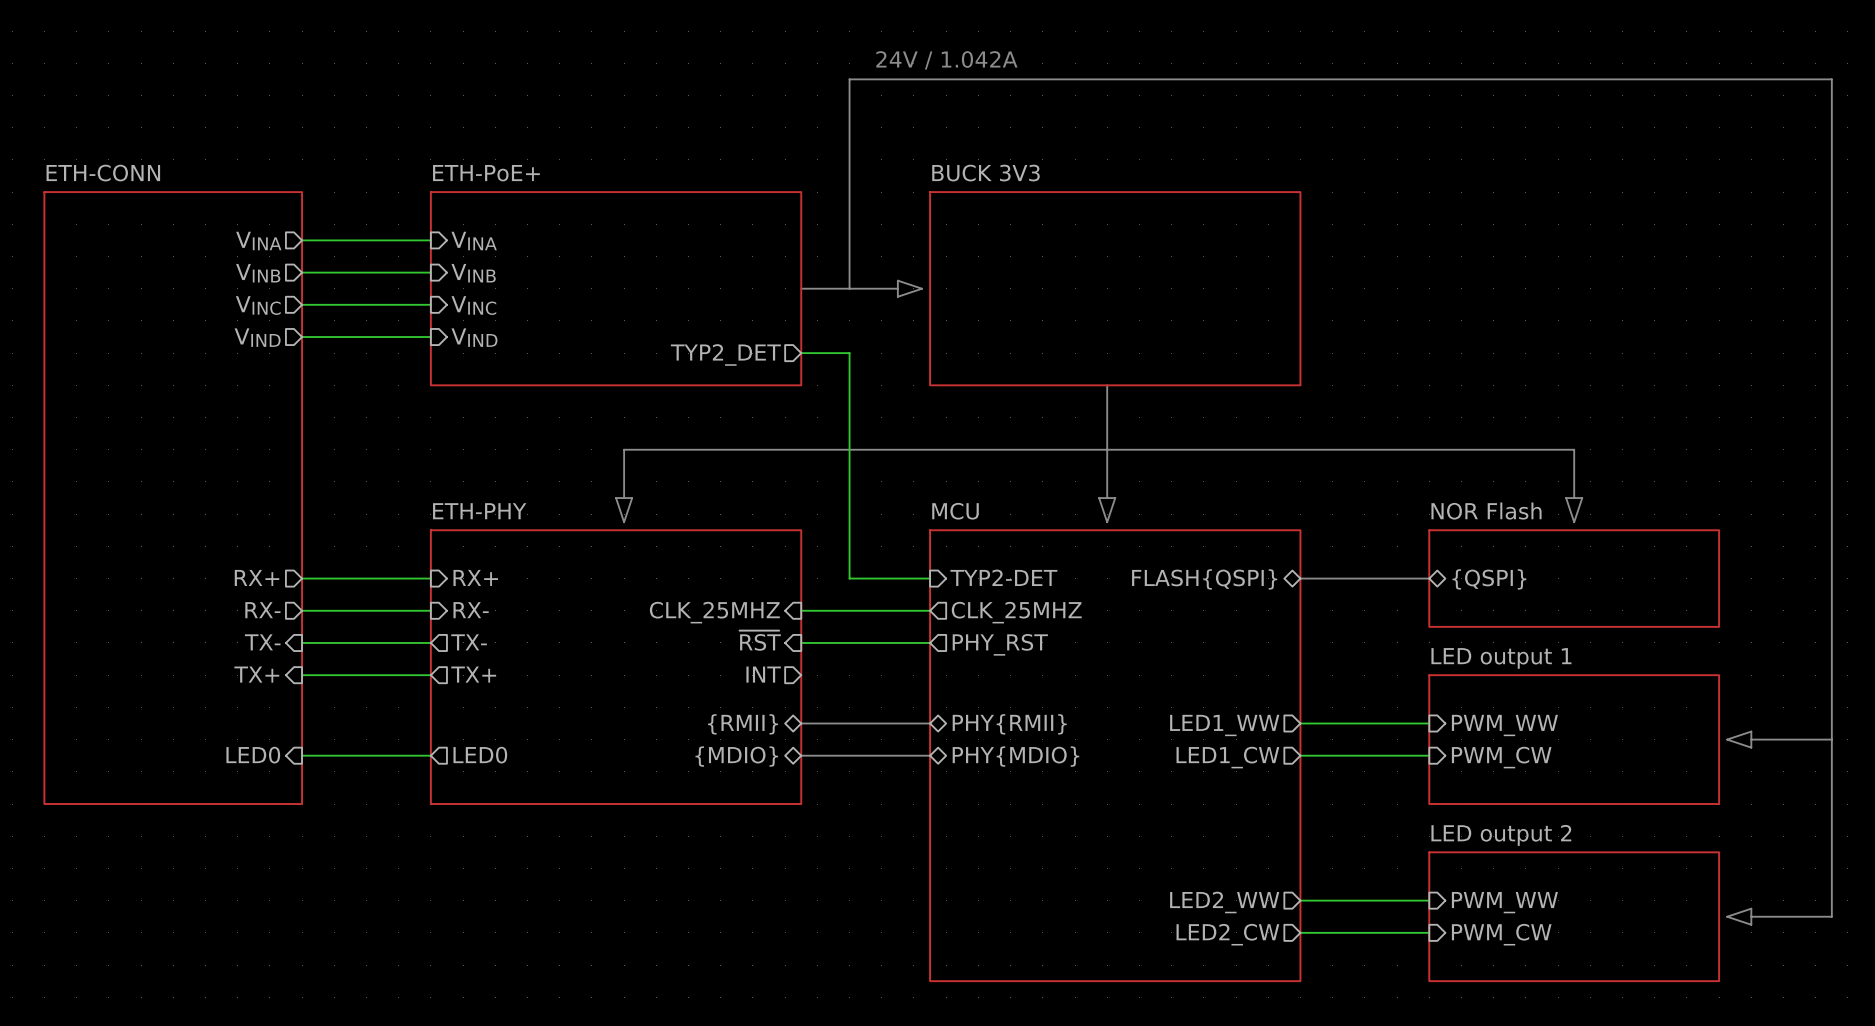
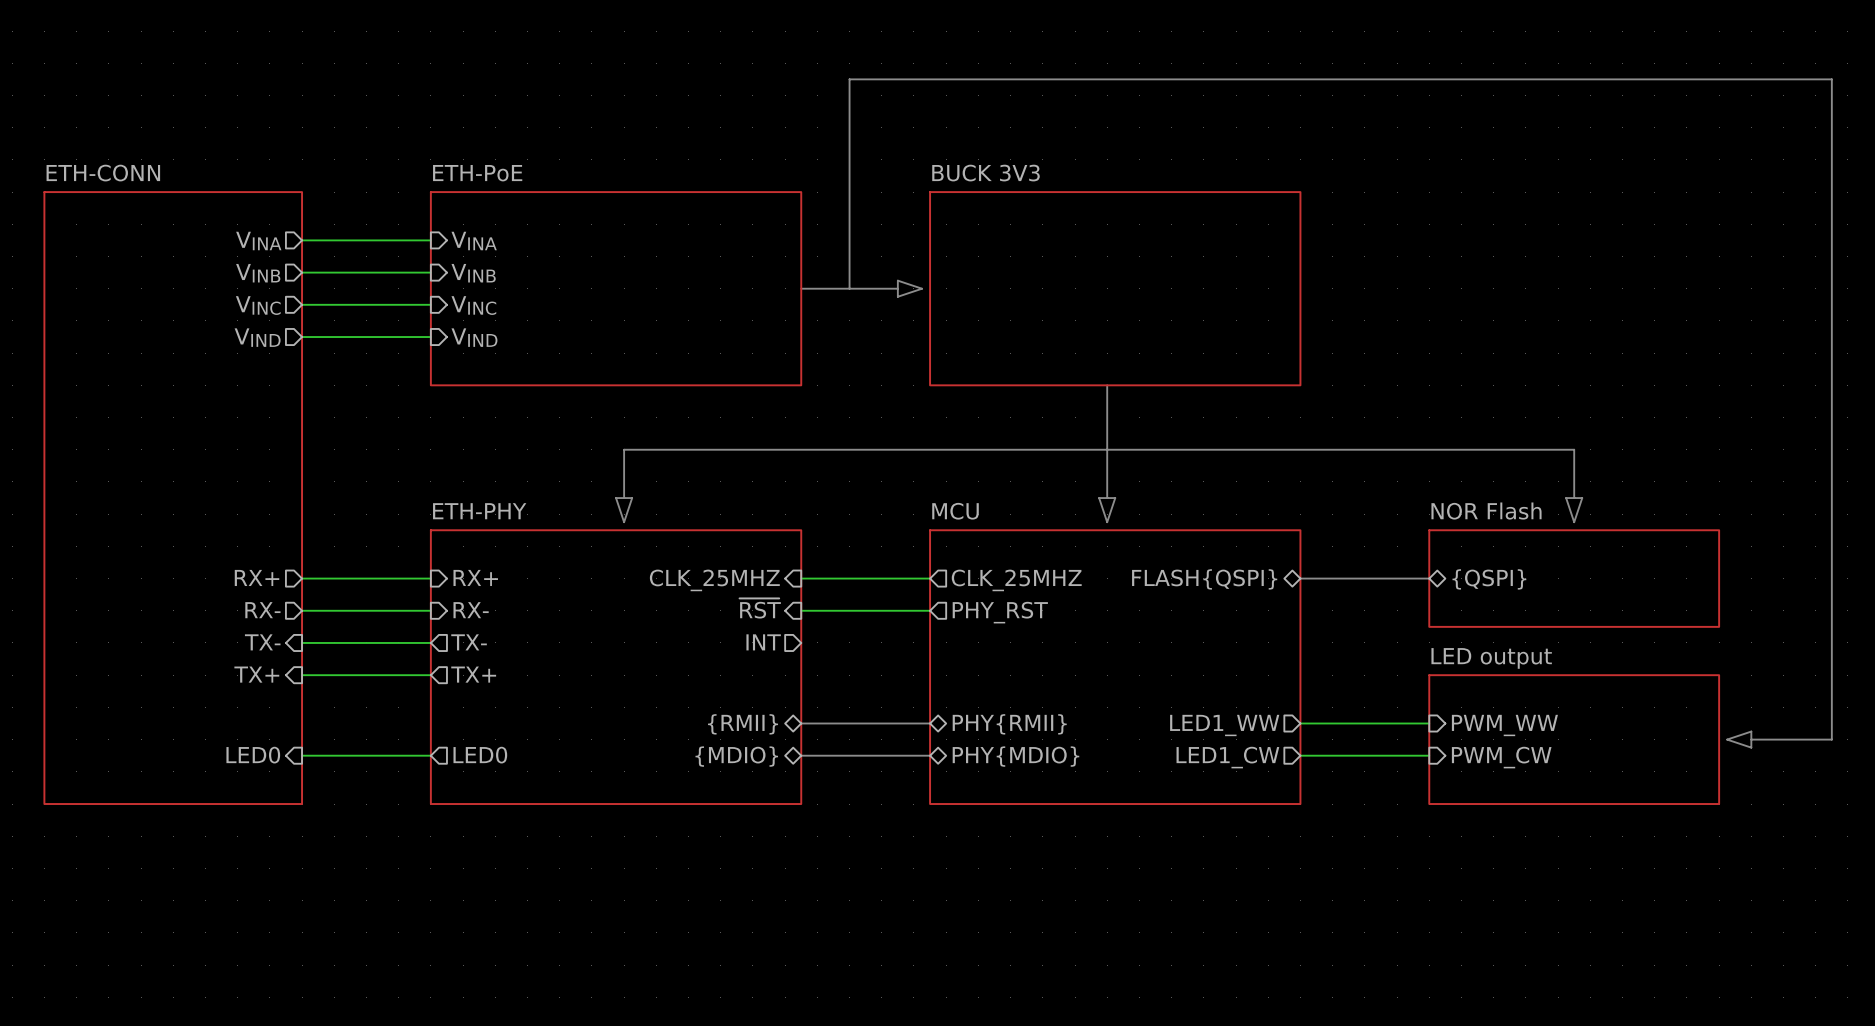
text: 24V / 1.042A (946, 60) -> none
sheet ETH-PoE+ name: ETH-PoE+ (486, 173) -> ETH-PoE (477, 173)
wire: (801, 353) (849, 353) (849, 578) -> (801, 578) (849, 578)
sheet pin: TYP2_DET (725, 354) -> none
sheet pin shape: input (1003, 577) -> output (1016, 580)
sheet pin: TYP2-DET (1003, 577) -> CLK_25MHZ (1016, 580)
sheet pin: none -> CLK_25MHZ (714, 580)
sheet pin: CLK_25MHZ (714, 612) -> ~{RST} (760, 608)
sheet pin: CLK_25MHZ (1016, 612) -> PHY_RST (1000, 612)
sheet pin shape: input (760, 640) -> output (763, 642)
sheet pin: ~{RST} (760, 640) -> INT (763, 642)
wire: (801, 642) (930, 642) -> none
sheet pin: PHY_RST (1000, 644) -> none
sheet LED output 1 name: LED output 1 (1501, 658) -> LED output (1491, 658)
sheet MCU: none -> (1115, 667)
sheet pin: INT (763, 674) -> none
line: (1831, 739) (1831, 916) (1751, 916) -> none
sheet MCU: (1115, 755) -> none
wire: (1300, 900) (1429, 900) -> none
sheet pin: LED2_WW (1224, 902) -> none
sheet pin: PWM_WW (1504, 902) -> none
line: (1751, 908) (1751, 924) (1727, 916) (1751, 908) -> none
sheet LED output 2: (1574, 916) -> none
wire: (1300, 932) (1429, 932) -> none
sheet pin: LED2_CW (1227, 934) -> none
sheet pin: PWM_CW (1501, 934) -> none

